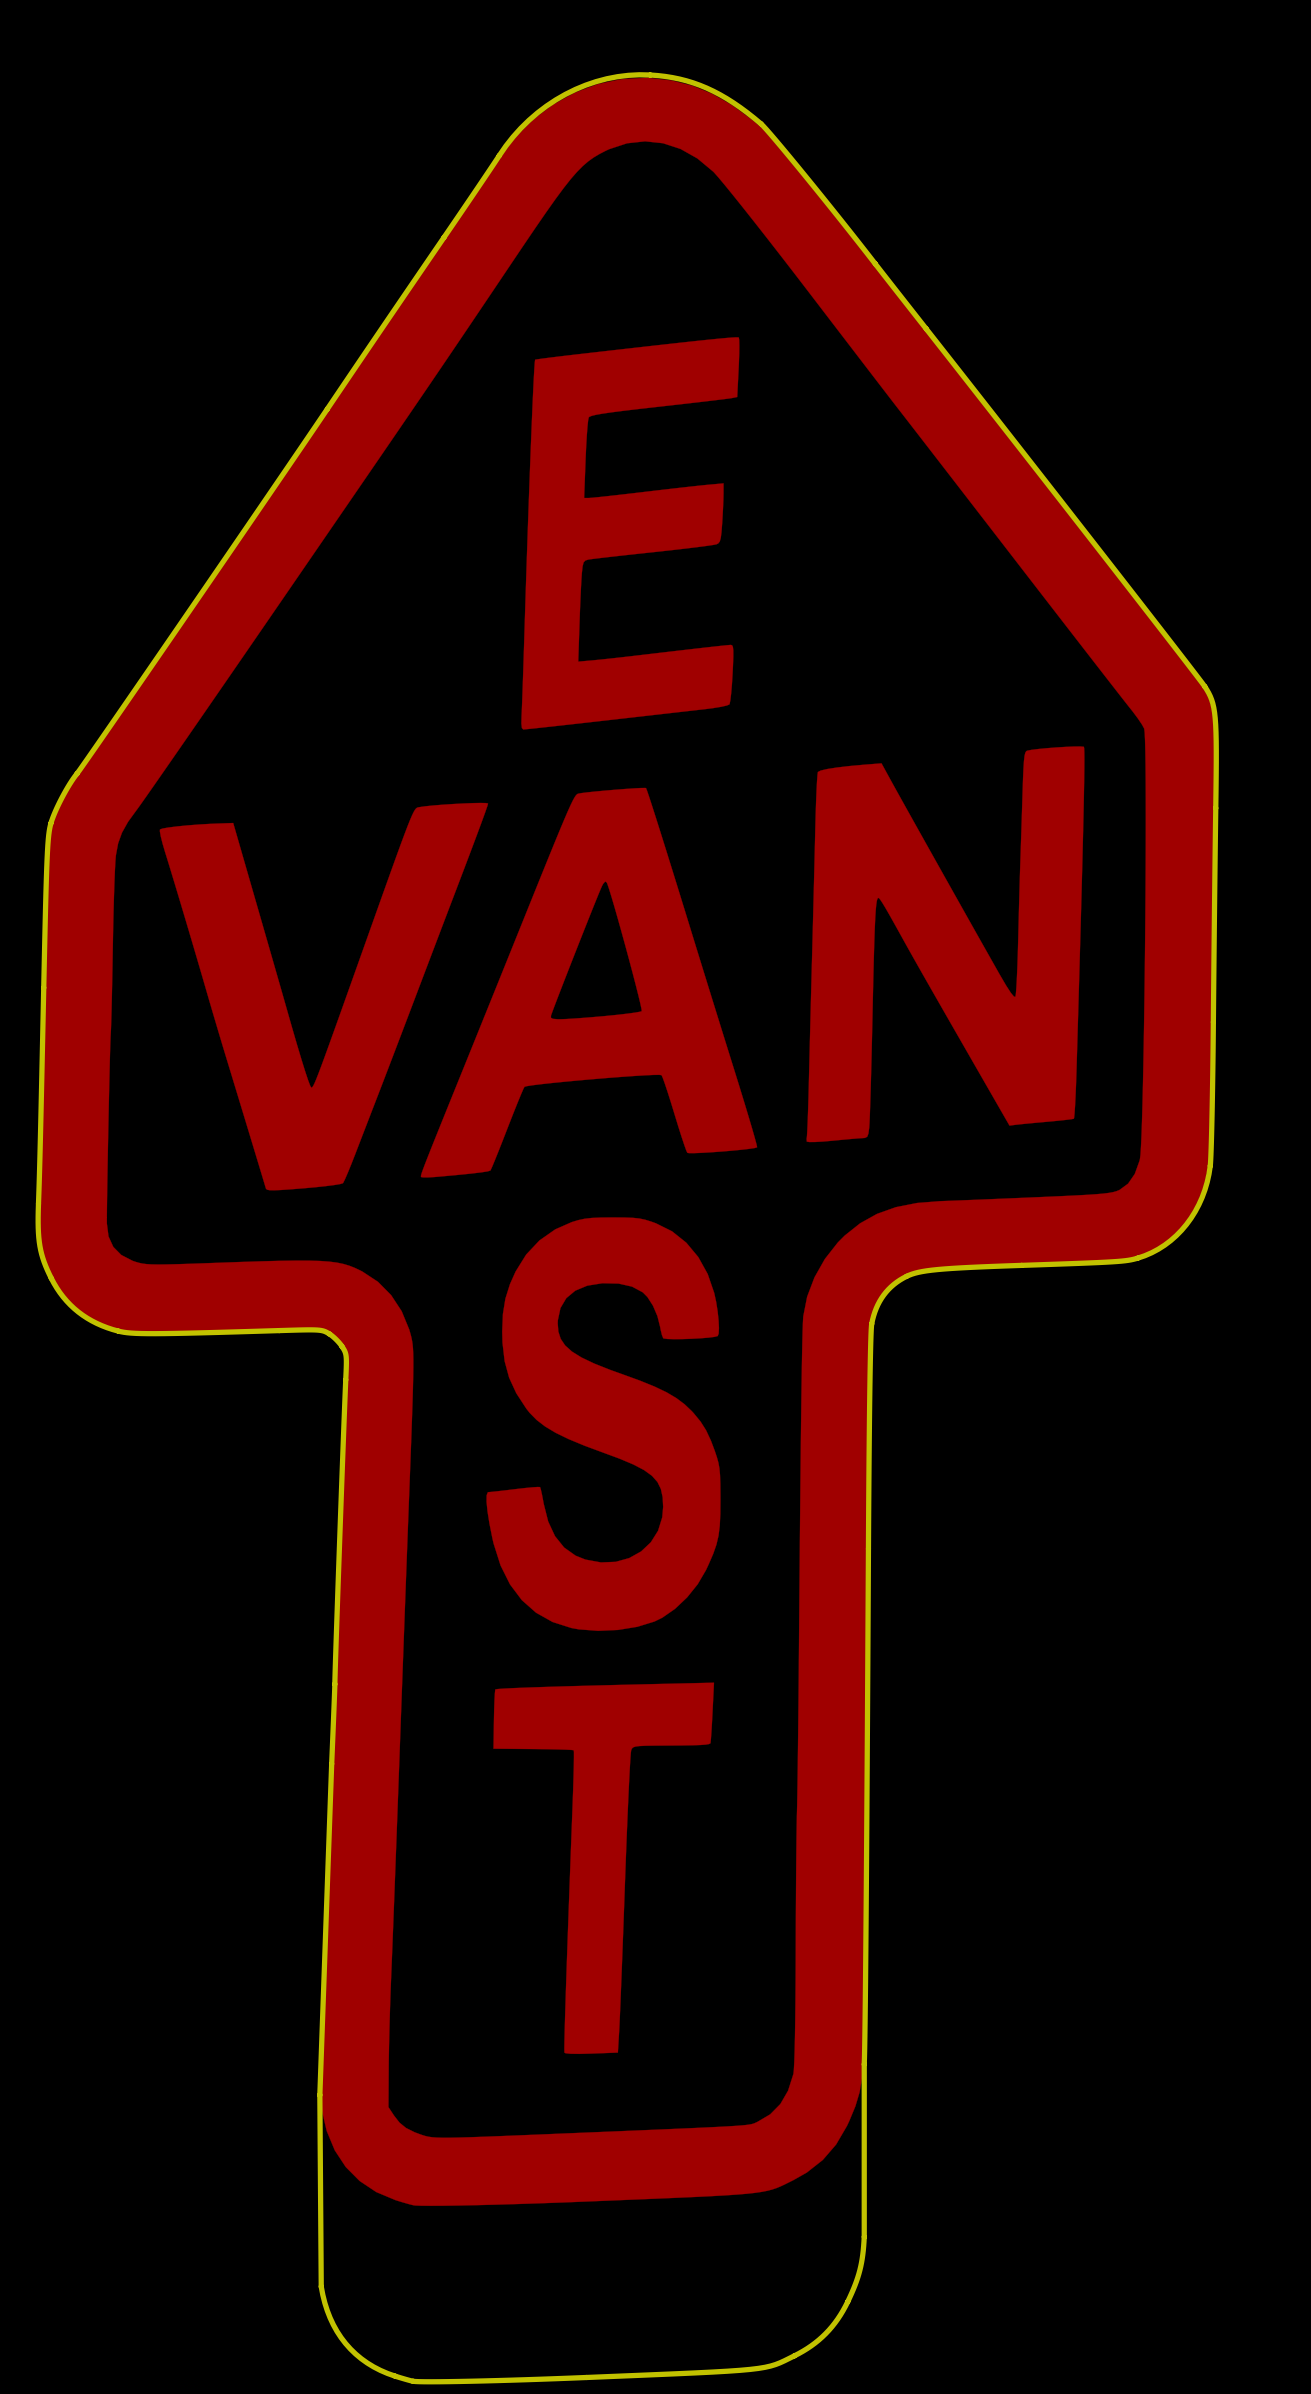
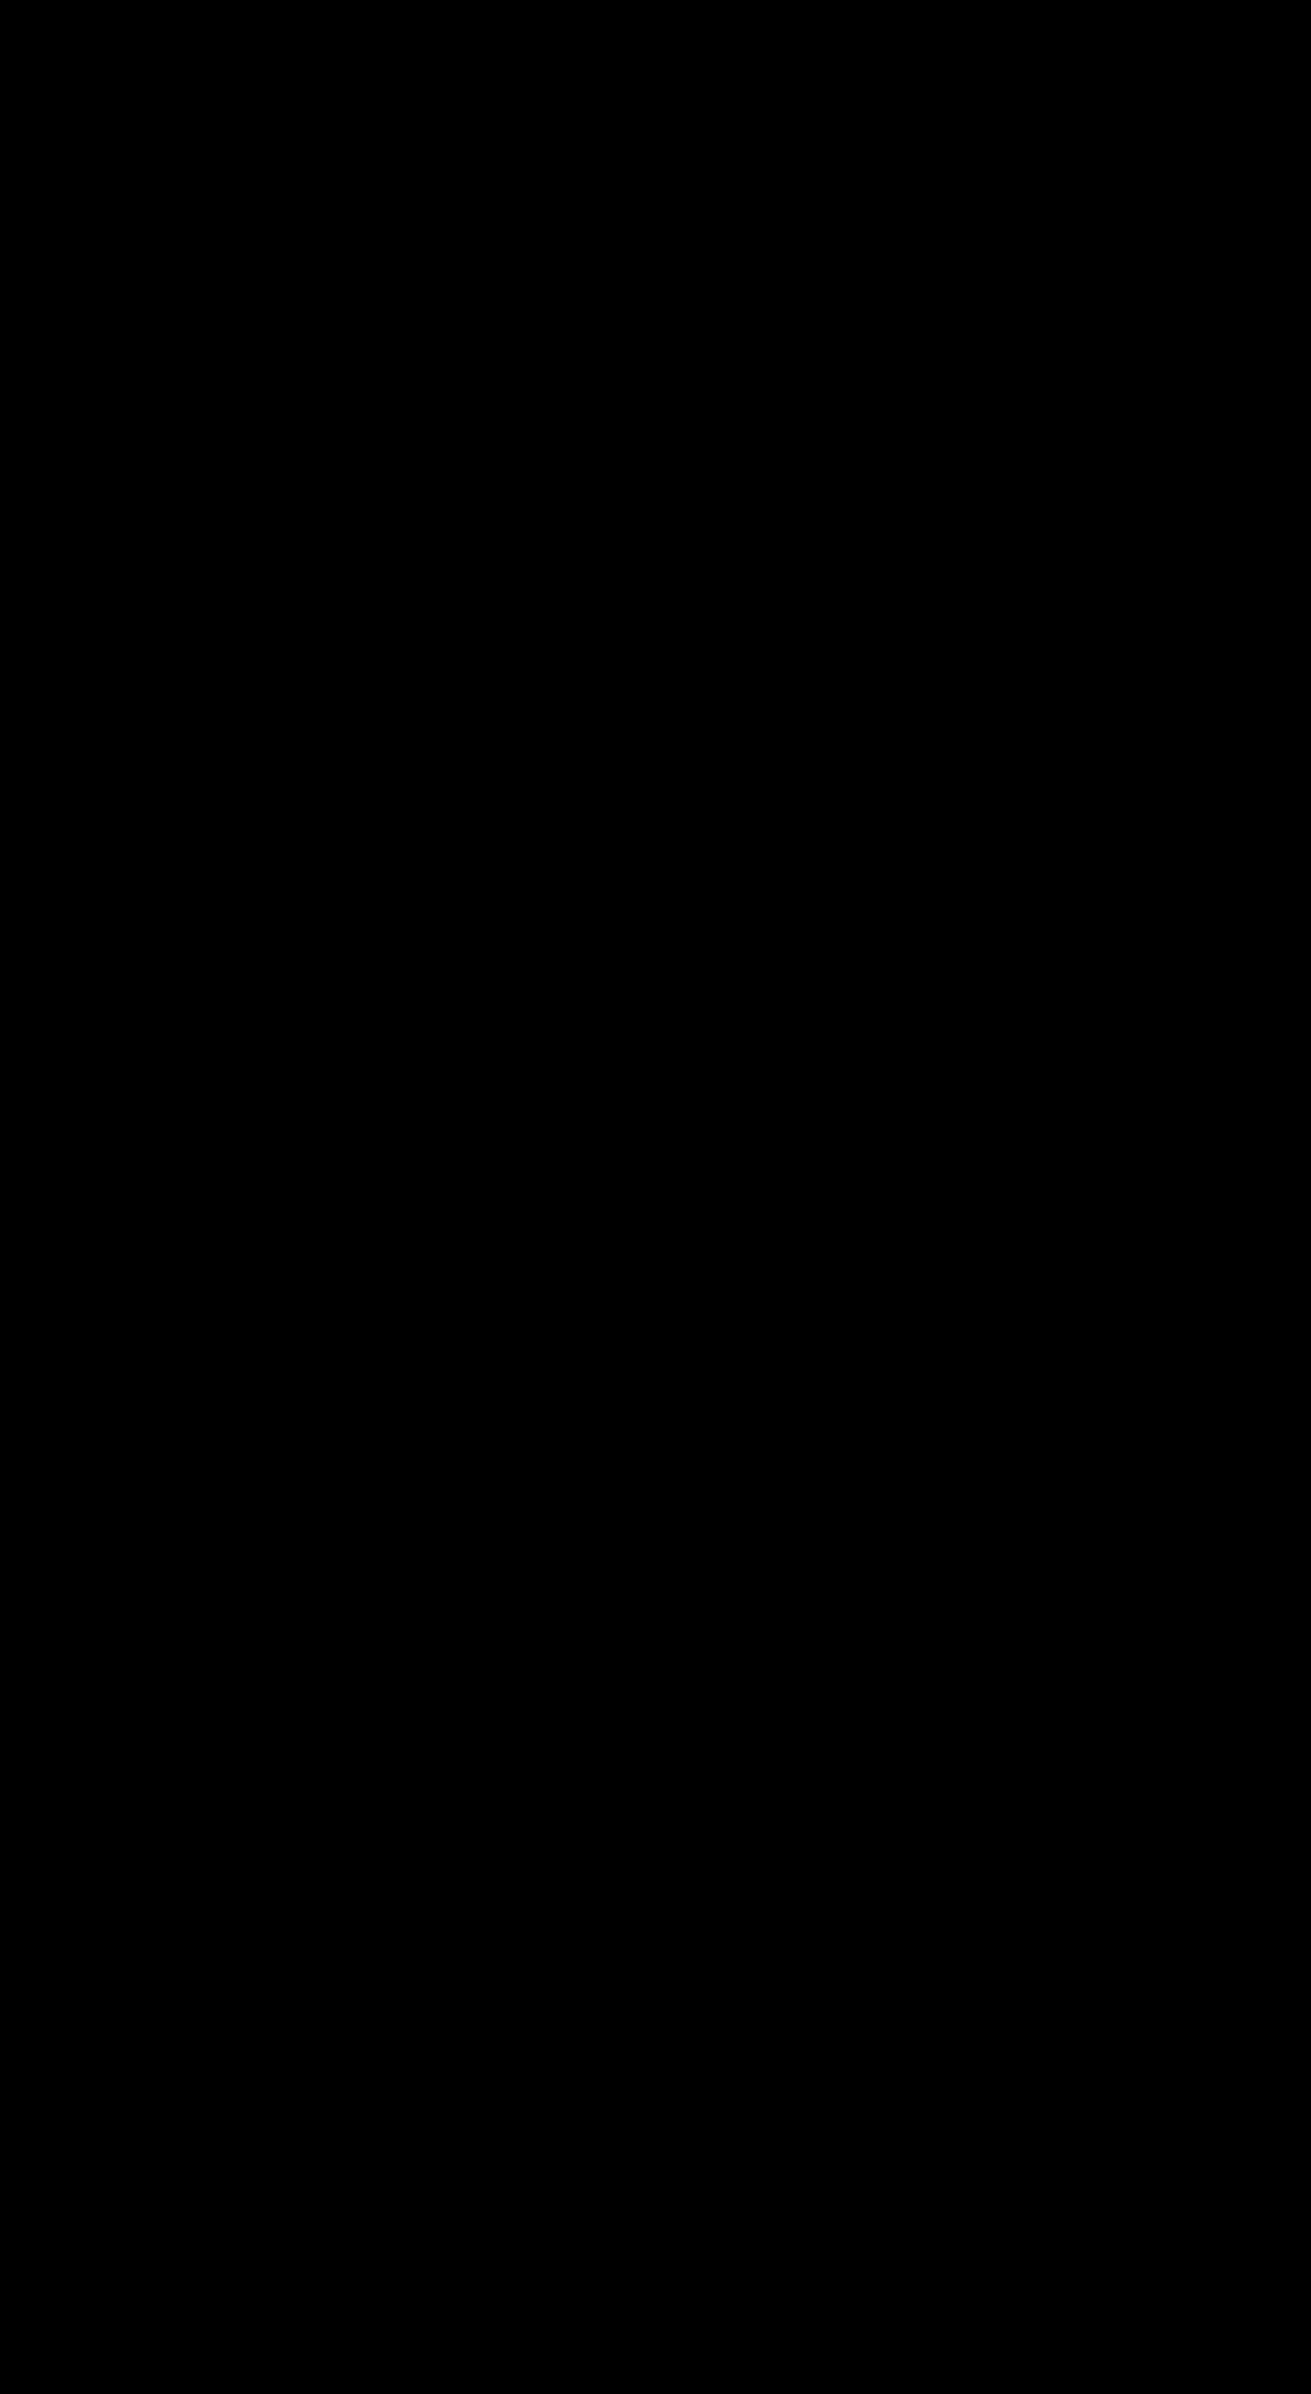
board edge: (650, 75) (686, 80) (713, 91) (740, 107) (766, 129) (858, 242) (1208, 693) (1214, 712) (1216, 751) (1210, 1165) (1204, 1189) (1191, 1218) (1170, 1240) (1151, 1252) (1133, 1259) (1117, 1261) (960, 1267) (918, 1272) (903, 1278) (890, 1286) (879, 1301) (873, 1315) (870, 1335) (869, 1438) (864, 2236) (858, 2273) (840, 2314) (825, 2333) (807, 2348) (779, 2362) (758, 2368) (570, 2378) (415, 2381) (380, 2370) (367, 2363) (350, 2348) (337, 2331) (330, 2317) (321, 2286) (319, 2094) (345, 1353) (334, 1337) (319, 1330) (155, 1333) (118, 1331) (101, 1325) (82, 1315) (66, 1301) (53, 1283) (41, 1254) (38, 1222) (48, 835) (55, 811) (71, 781) (513, 136) (537, 112) (575, 89) (617, 76) (650, 75) -> none
drawing: [39, 77, 1215, 2206] -> none

